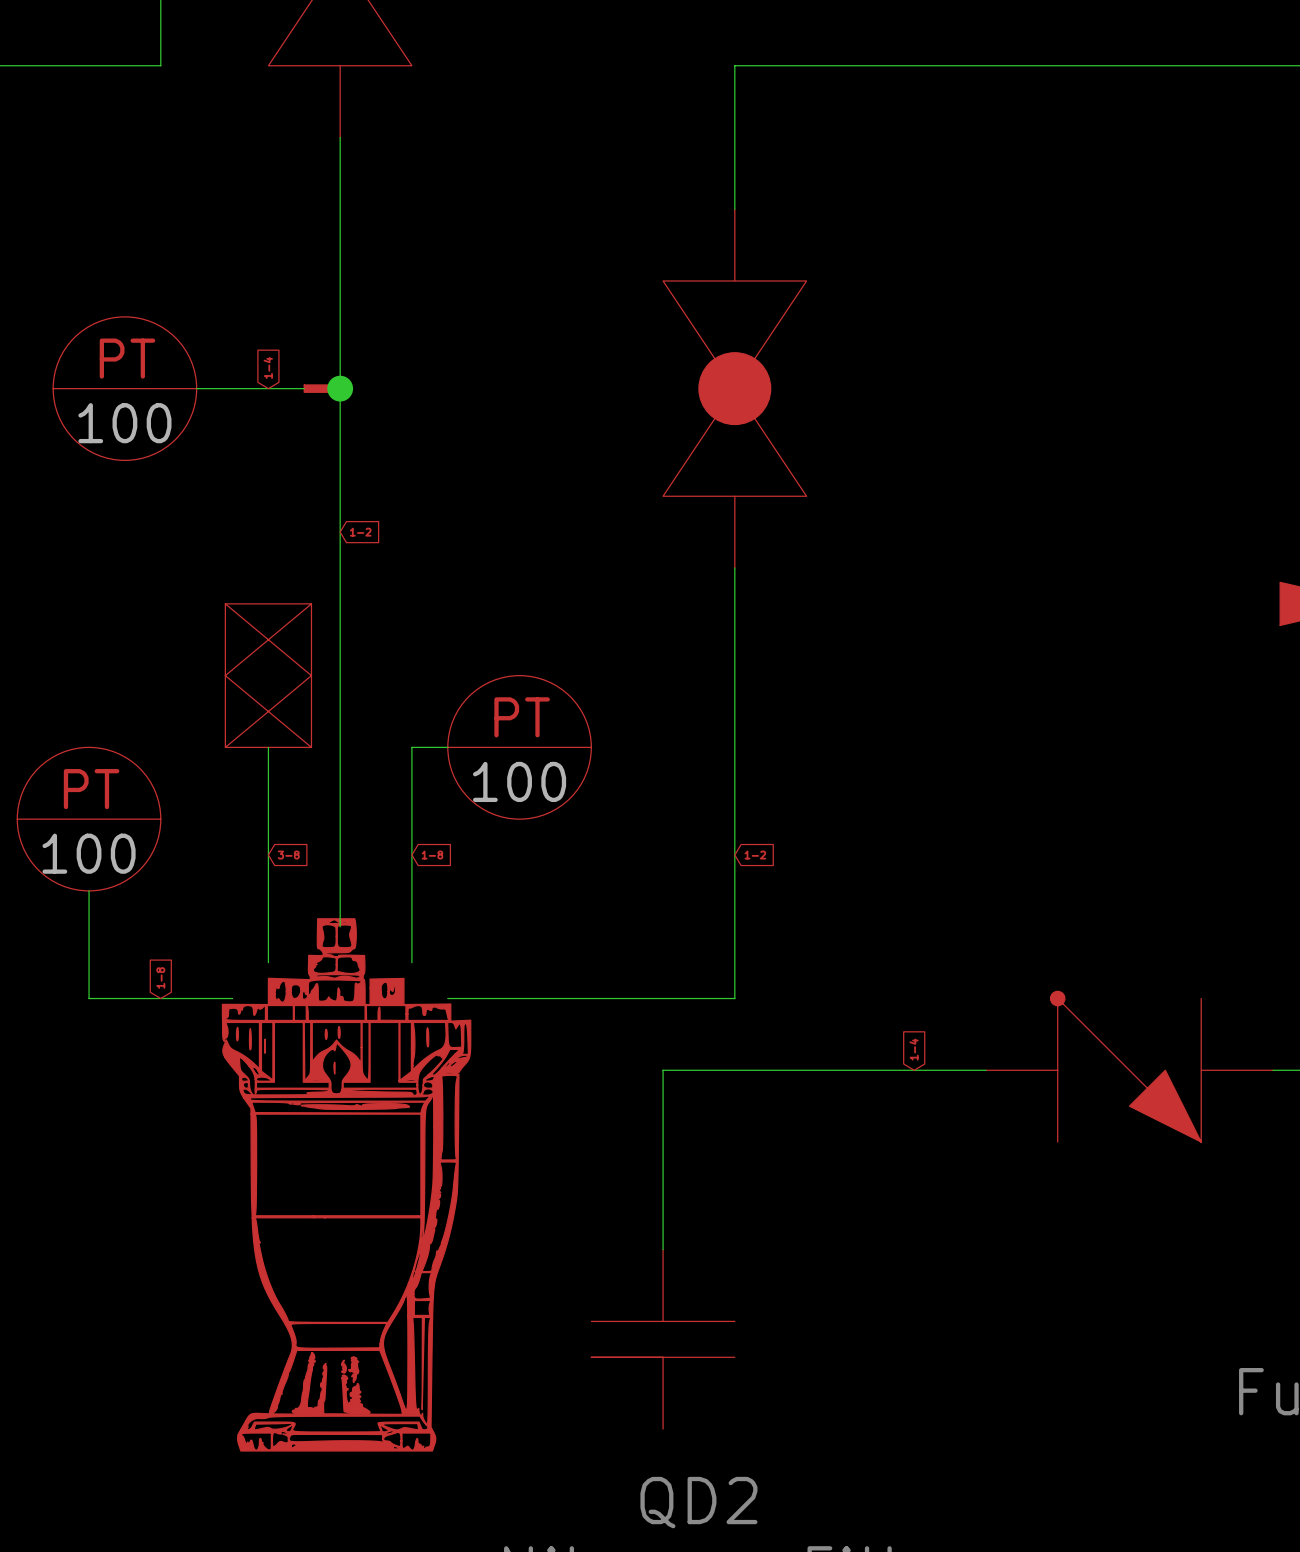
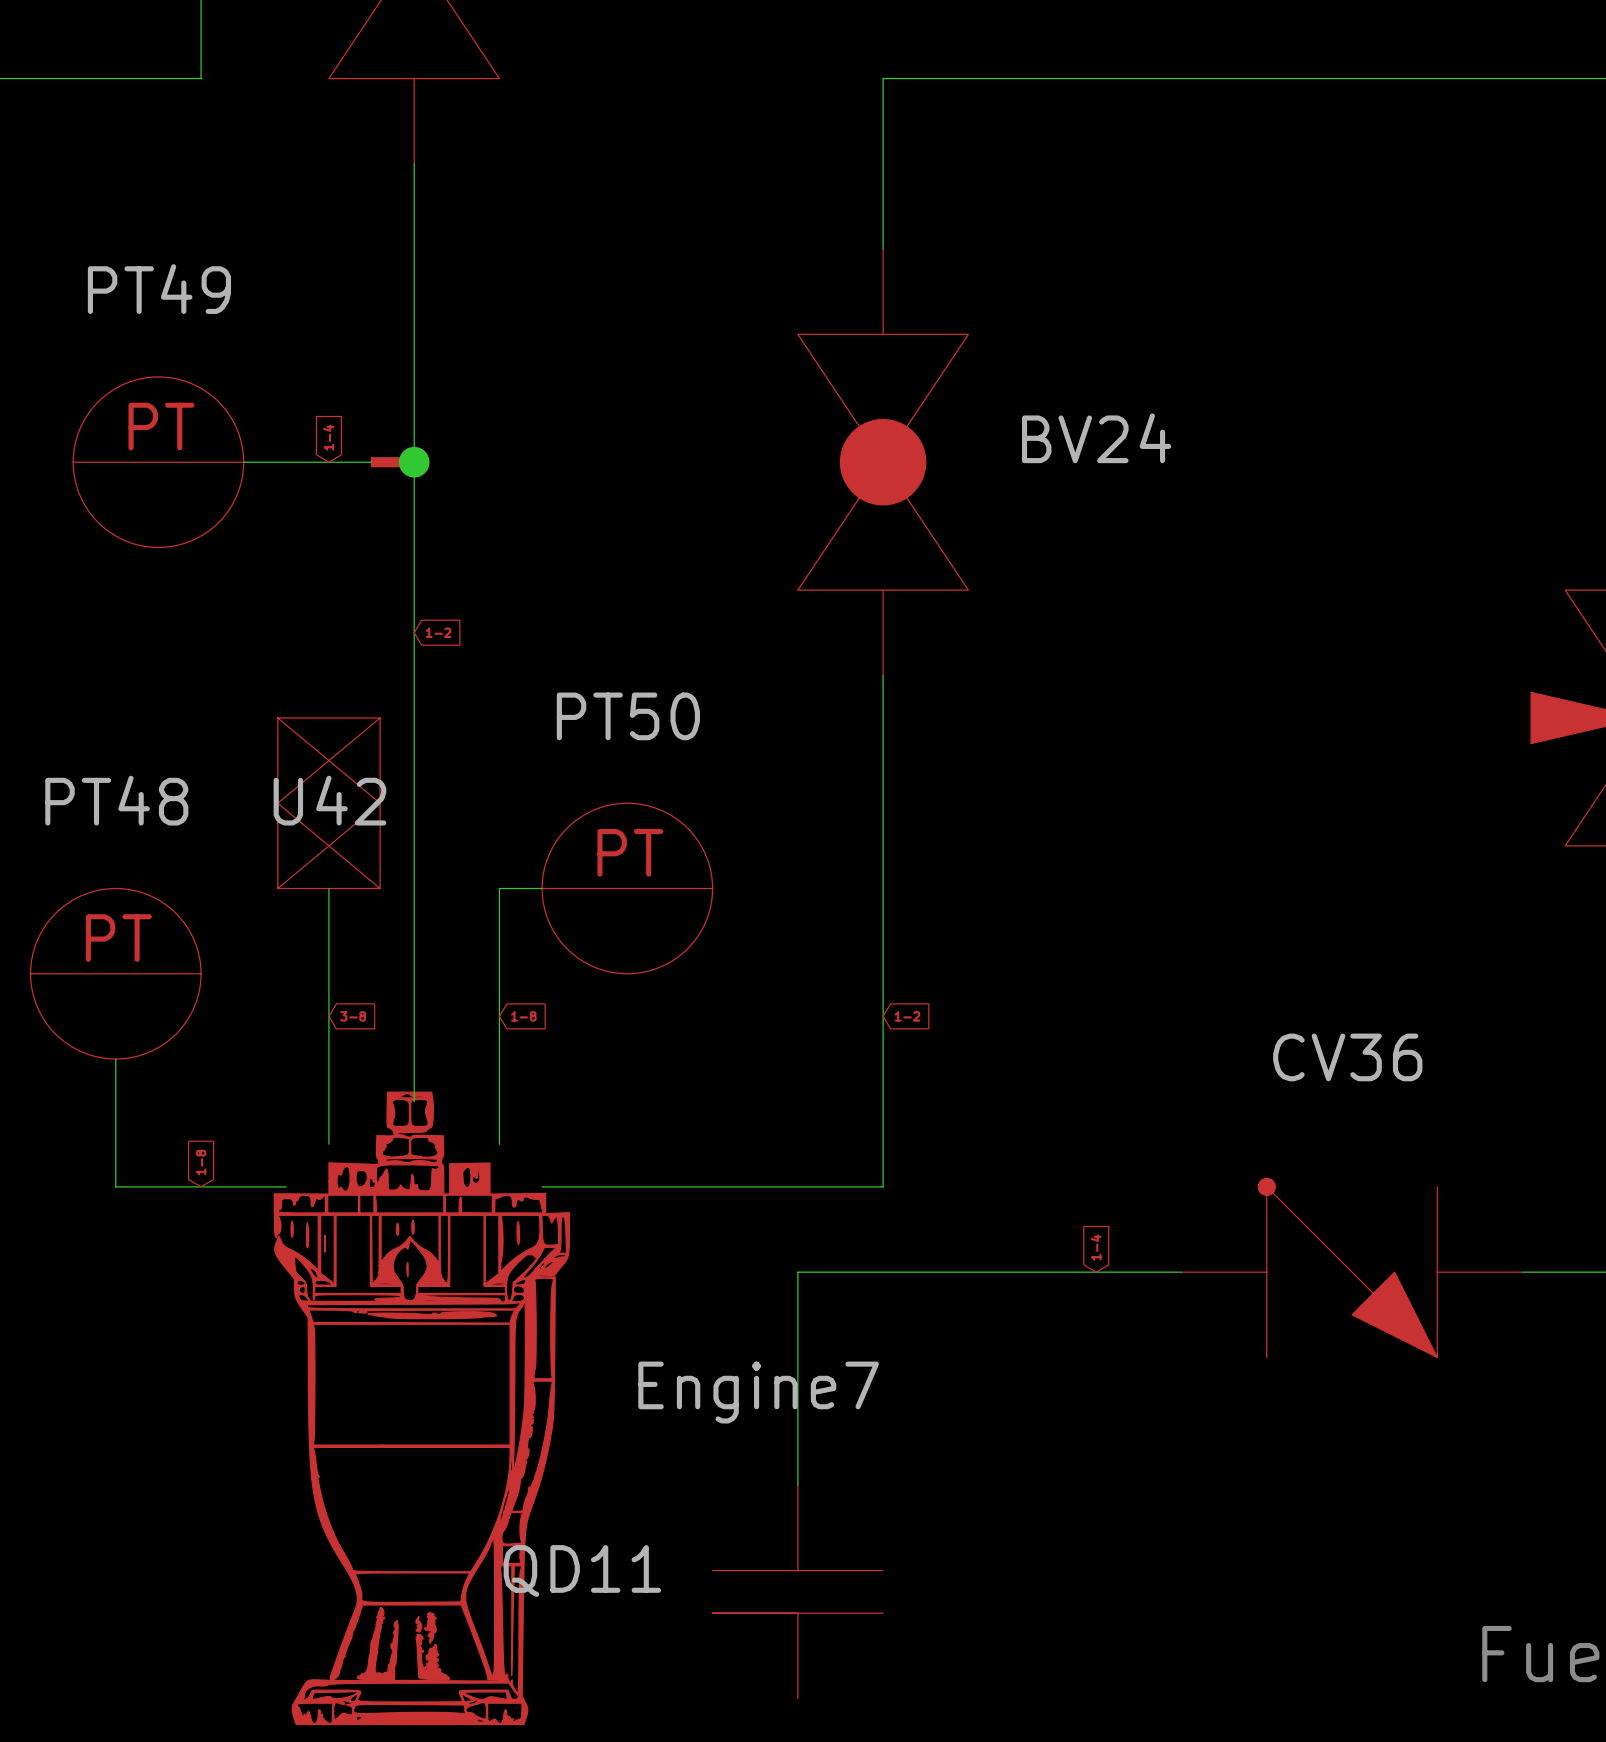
PT49 name: none -> PT49 (159, 289)
BV24 name: none -> BV24 (1096, 438)
PT49 value: 100 (124, 423) -> none
PT50 name: none -> PT50 (628, 716)
PT48 name: none -> PT48 (116, 800)
U42 name: none -> U42 (329, 800)
PT50 value: 100 (519, 781) -> none
PT48 value: 100 (89, 853) -> none
CV36 name: none -> CV36 (1347, 1057)
Engine7 name: none -> Engine7 (758, 1392)
QD11 name: none -> QD11 (582, 1570)

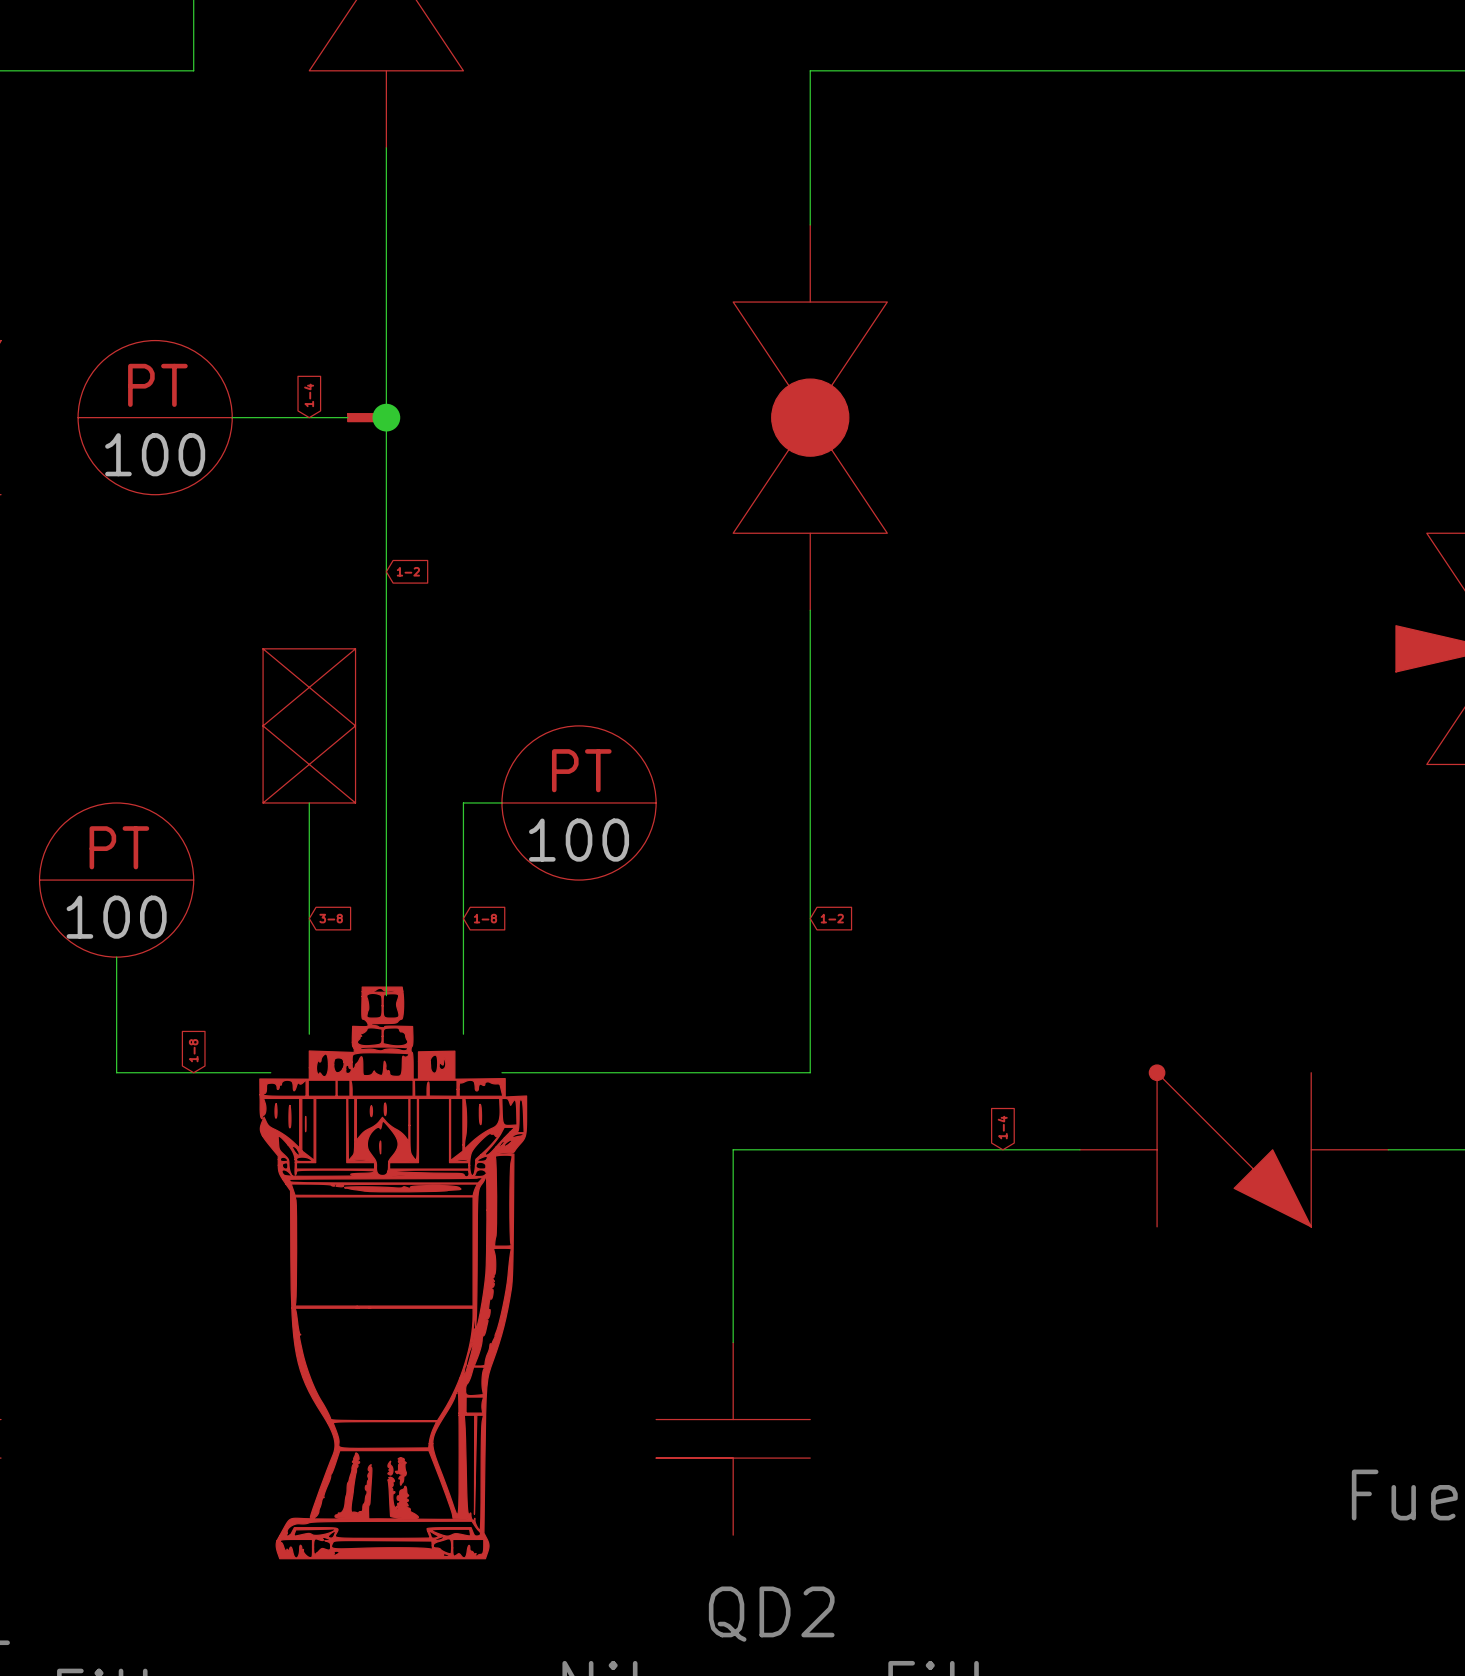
PT49 name: PT49 (159, 289) -> none
BV24 name: BV24 (1096, 438) -> none
PT49 value: none -> 100 (155, 454)
PT50 name: PT50 (628, 716) -> none
PT48 name: PT48 (116, 800) -> none
U42 name: U42 (329, 800) -> none
PT50 value: none -> 100 (579, 840)
PT48 value: none -> 100 (116, 917)
CV36 name: CV36 (1347, 1057) -> none
Engine7 name: Engine7 (758, 1392) -> none
QD11 name: QD11 (582, 1570) -> none

